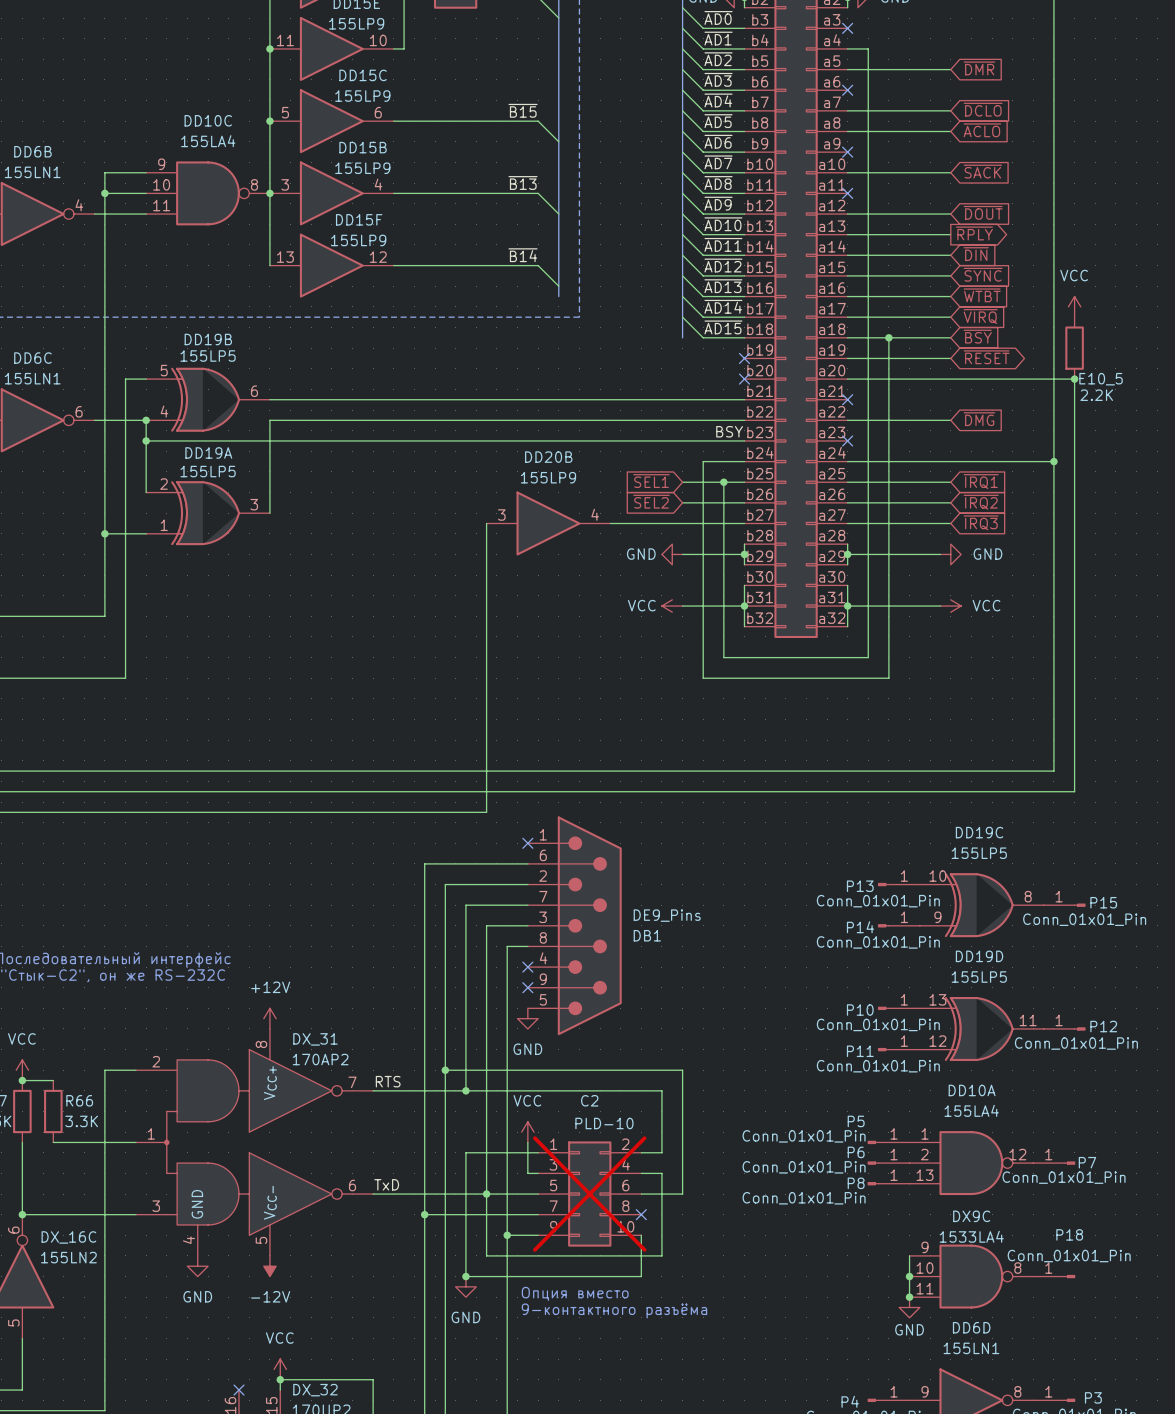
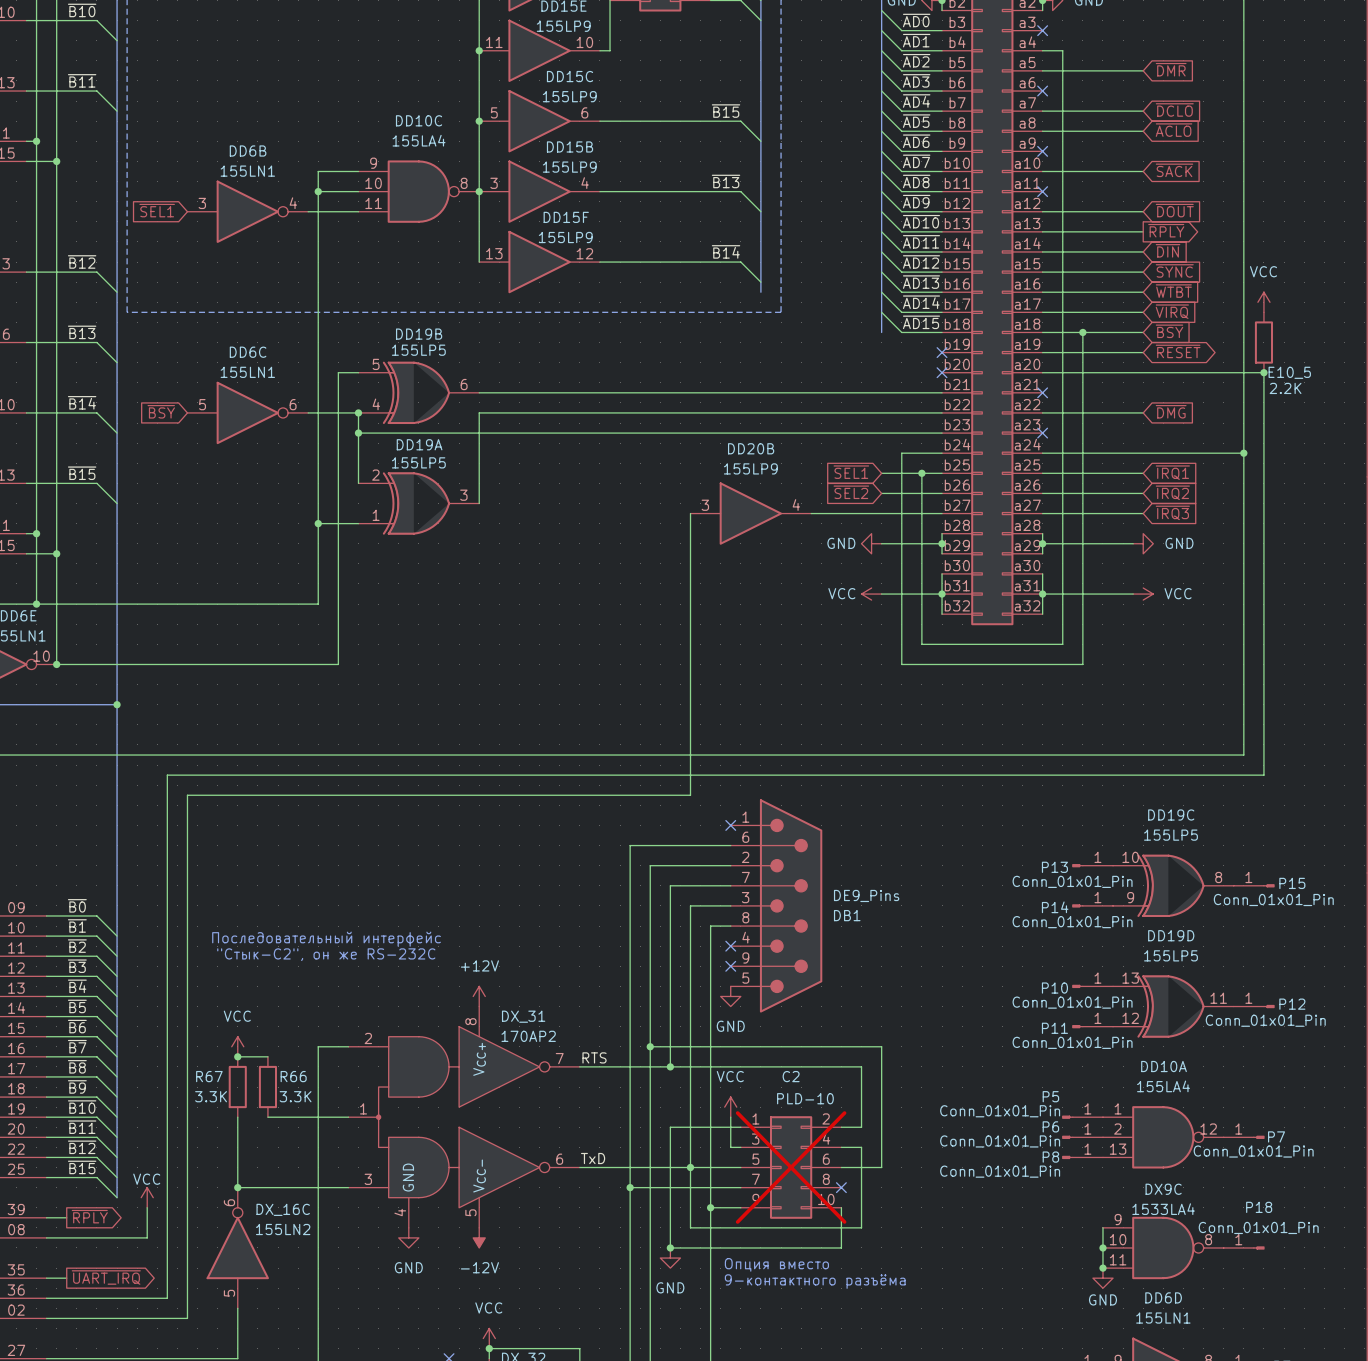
label: BSY (729, 431) -> none

